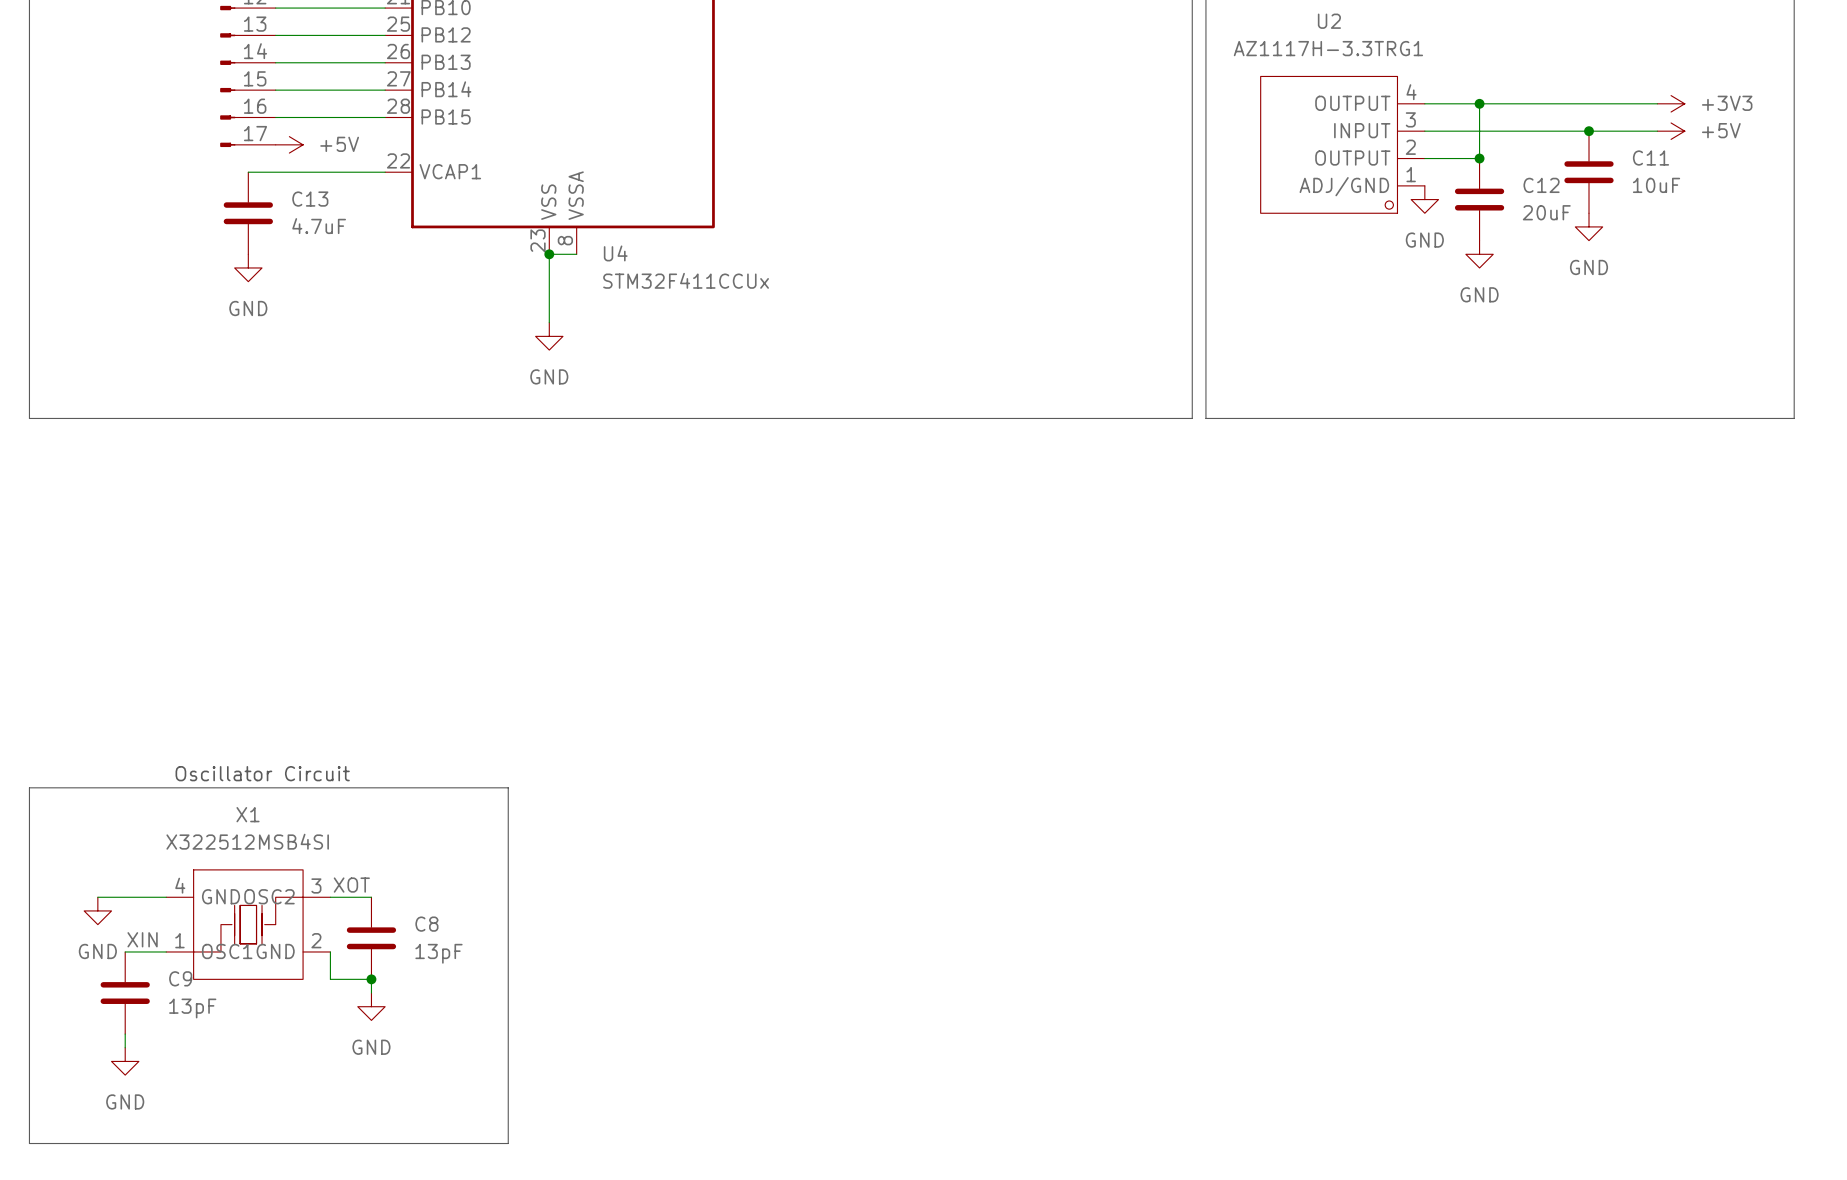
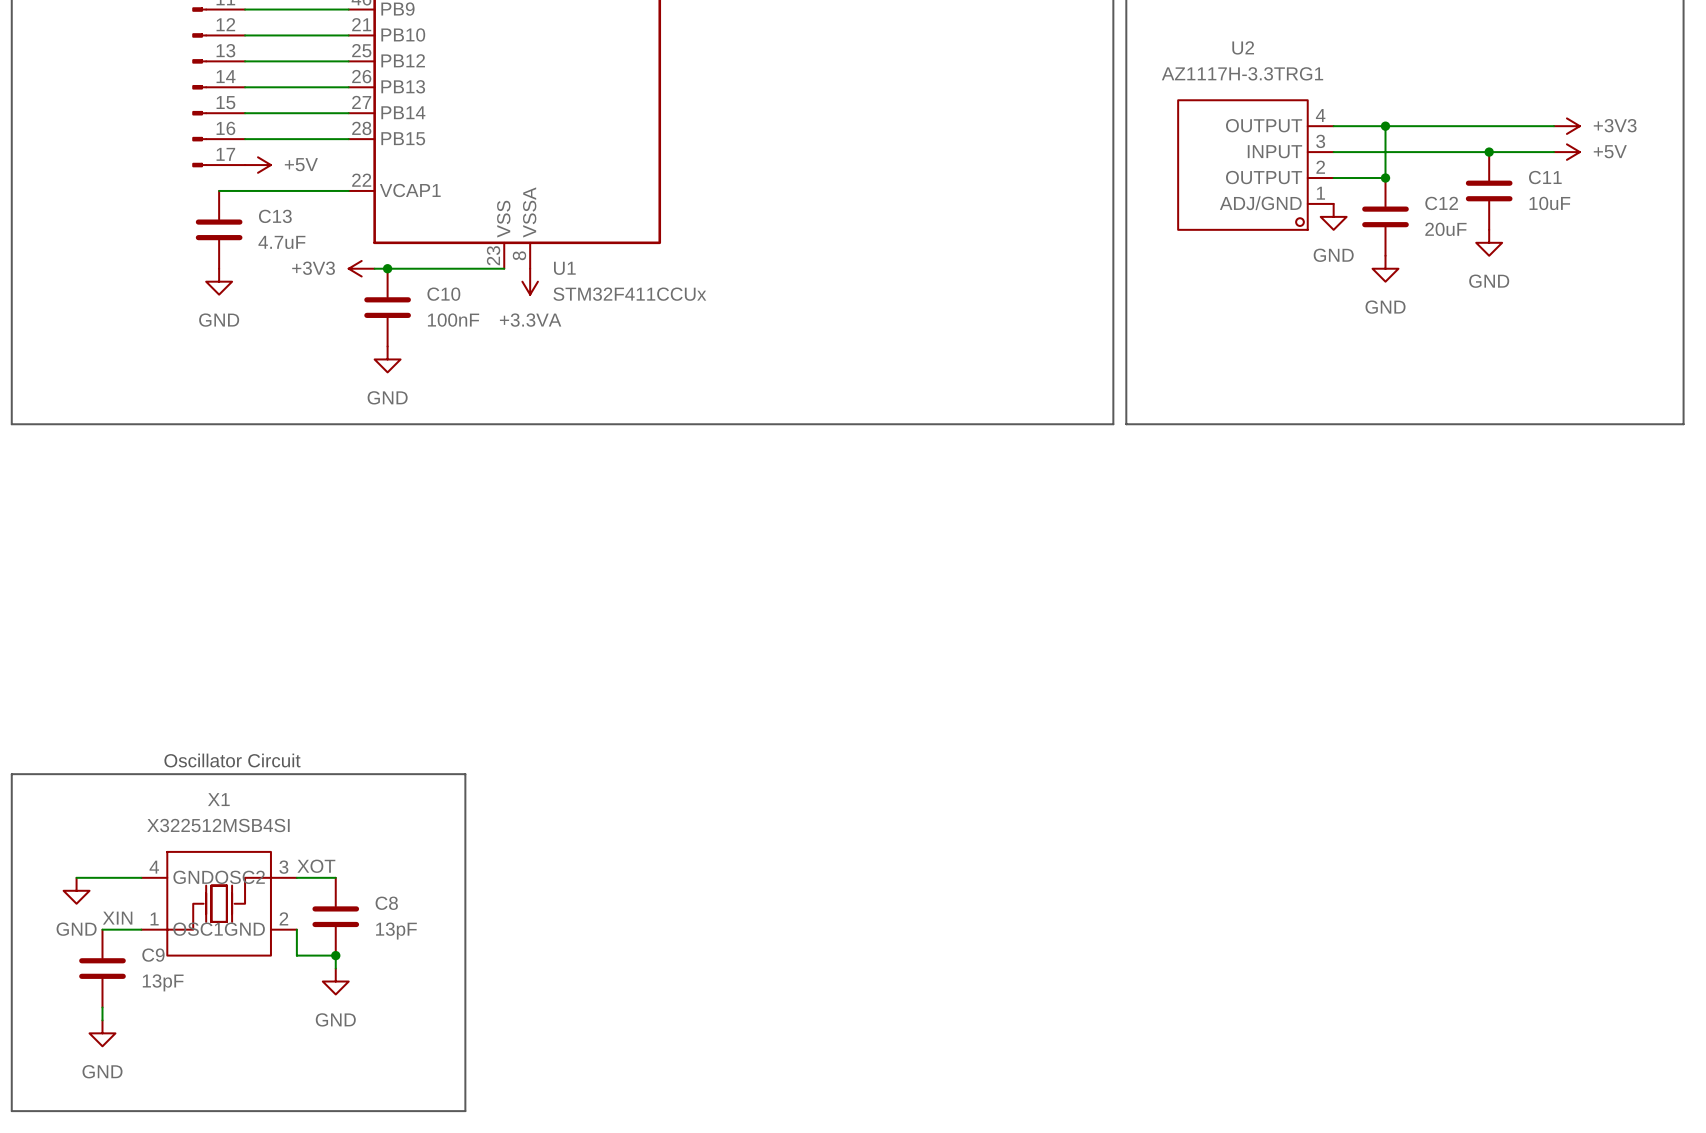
U4 name: U4 (615, 253) -> U1 (564, 268)
power symbol: none -> +3V3 (361, 268)
wire: none -> (374, 268) (504, 268)
junction: none -> (387, 268)
junction: (549, 254) -> none
wire: (576, 254) (549, 254) (549, 322) -> none
power symbol: none -> +3.3VA (530, 281)
C10: none -> 100nF (387, 307)
power symbol position: GND (549, 336) -> GND (387, 359)

